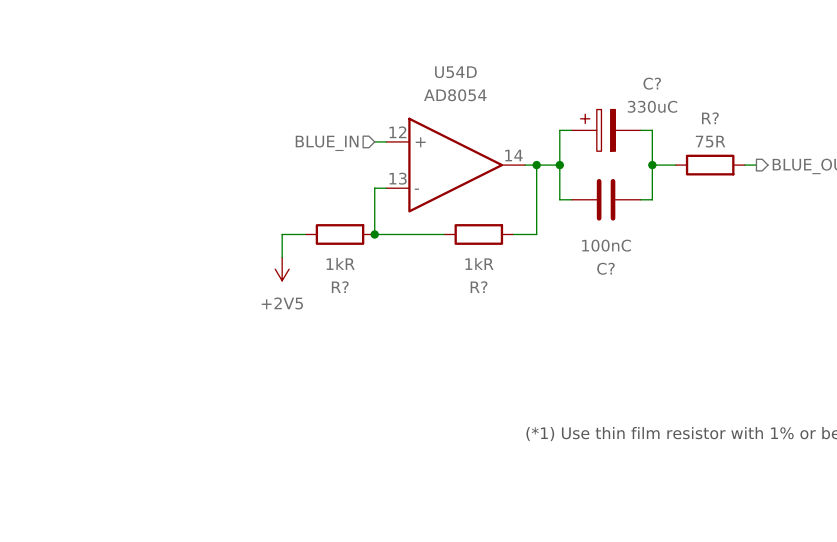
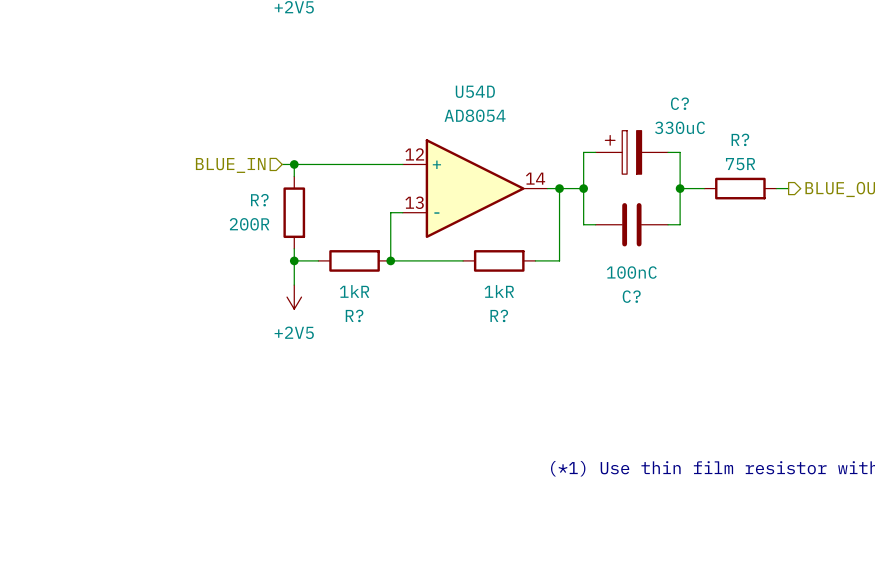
wire: none -> (282, 164) (390, 164)
wire: none -> (294, 164) (294, 176)
junction: none -> (294, 164)
hierarchical label position: BLUE_IN (327, 143) -> BLUE_IN (230, 165)
R?: none -> 200R (294, 212)
wire: none -> (294, 248) (294, 260)
junction: none -> (294, 260)

